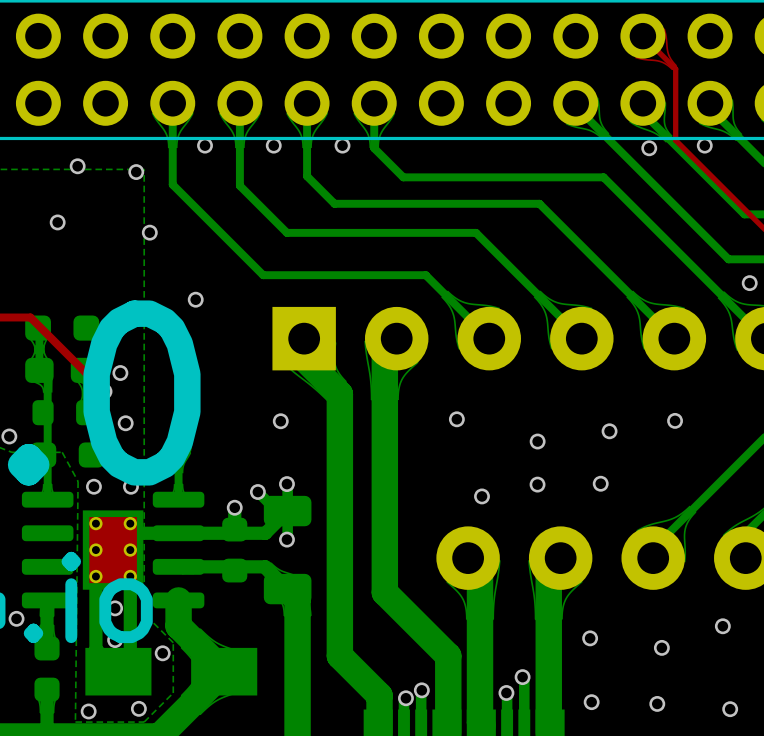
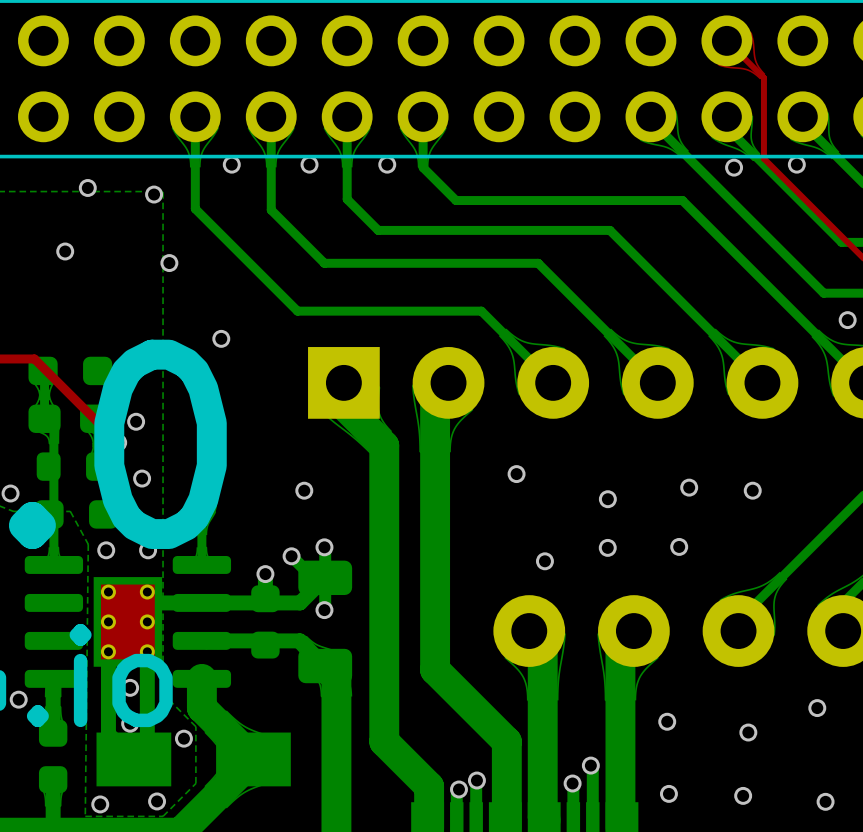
via position: (675, 420) -> (752, 490)
via position: (280, 421) -> (304, 490)

